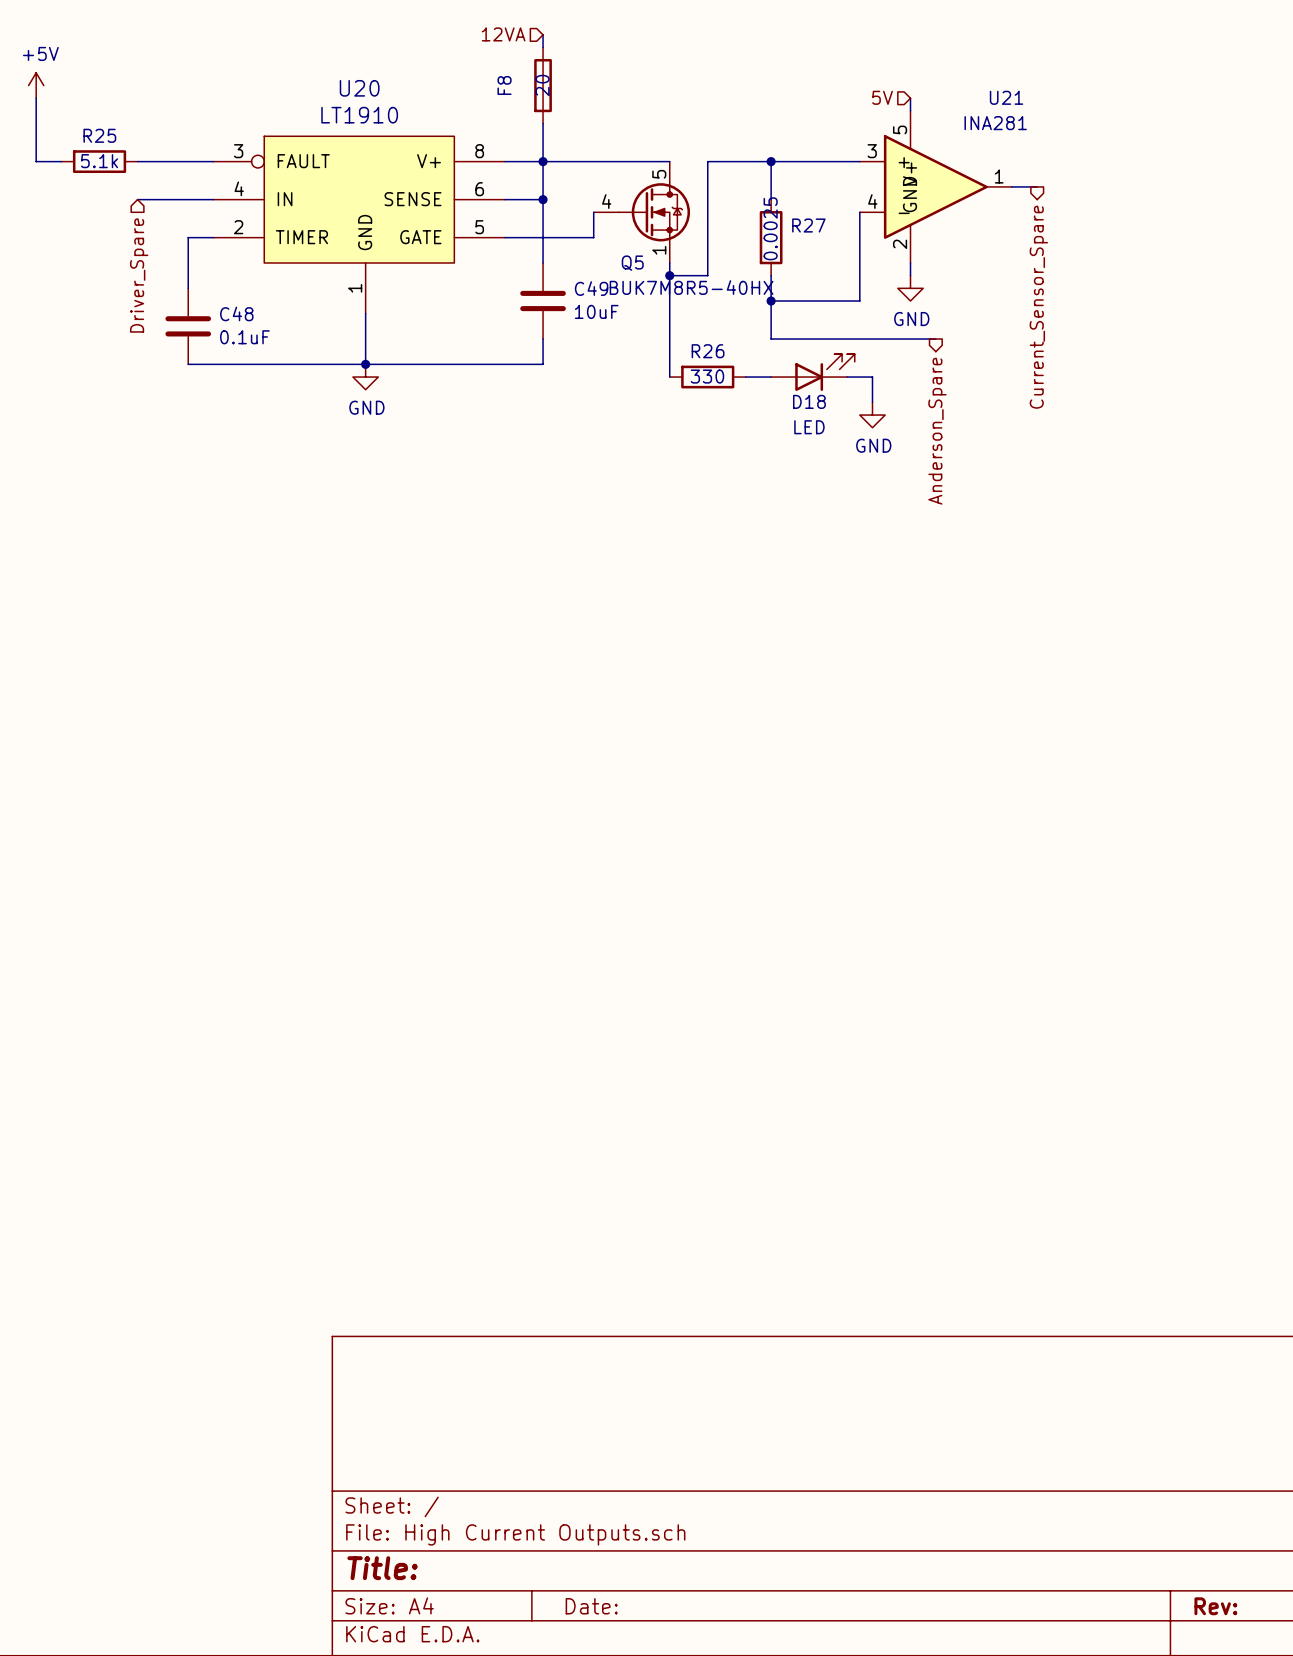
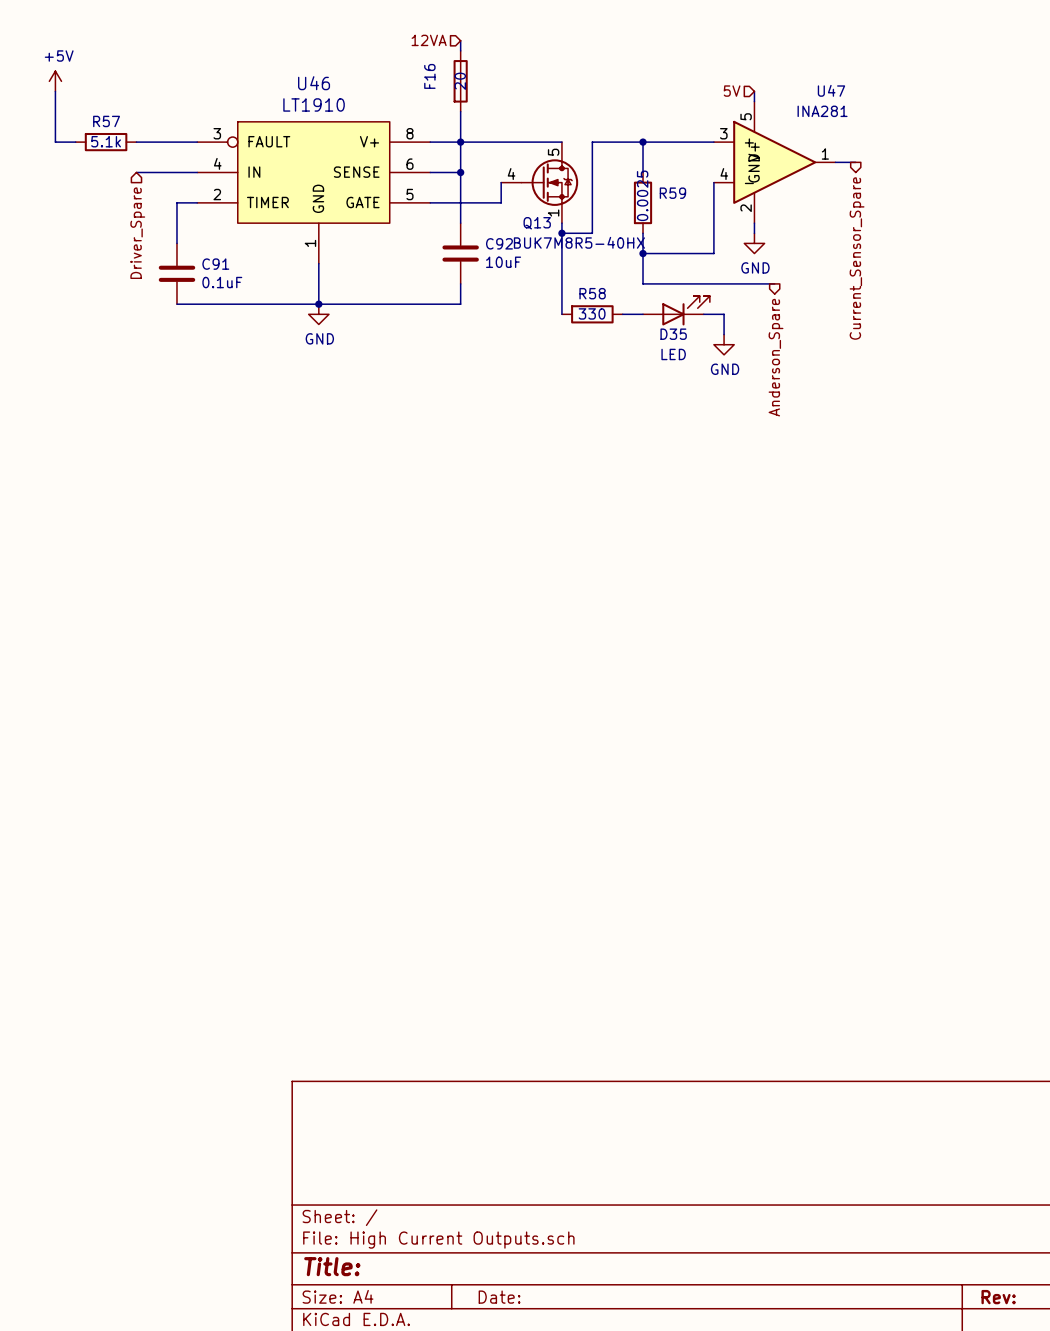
F8 name: F8 (504, 85) -> F16 (429, 76)
U20 name: U20 (359, 88) -> U46 (314, 83)
U21 name: U21 (1006, 97) -> U47 (831, 90)
R25 name: R25 (99, 135) -> R57 (106, 121)
R27 name: R27 (808, 225) -> R59 (672, 193)
Q5 name: Q5 (632, 263) -> Q13 (537, 223)
C49 name: C49 (591, 288) -> C92 (499, 243)
C48 name: C48 (236, 313) -> C91 (215, 264)
R26 name: R26 (708, 351) -> R58 (592, 293)
D18 name: D18 (809, 401) -> D35 (673, 334)

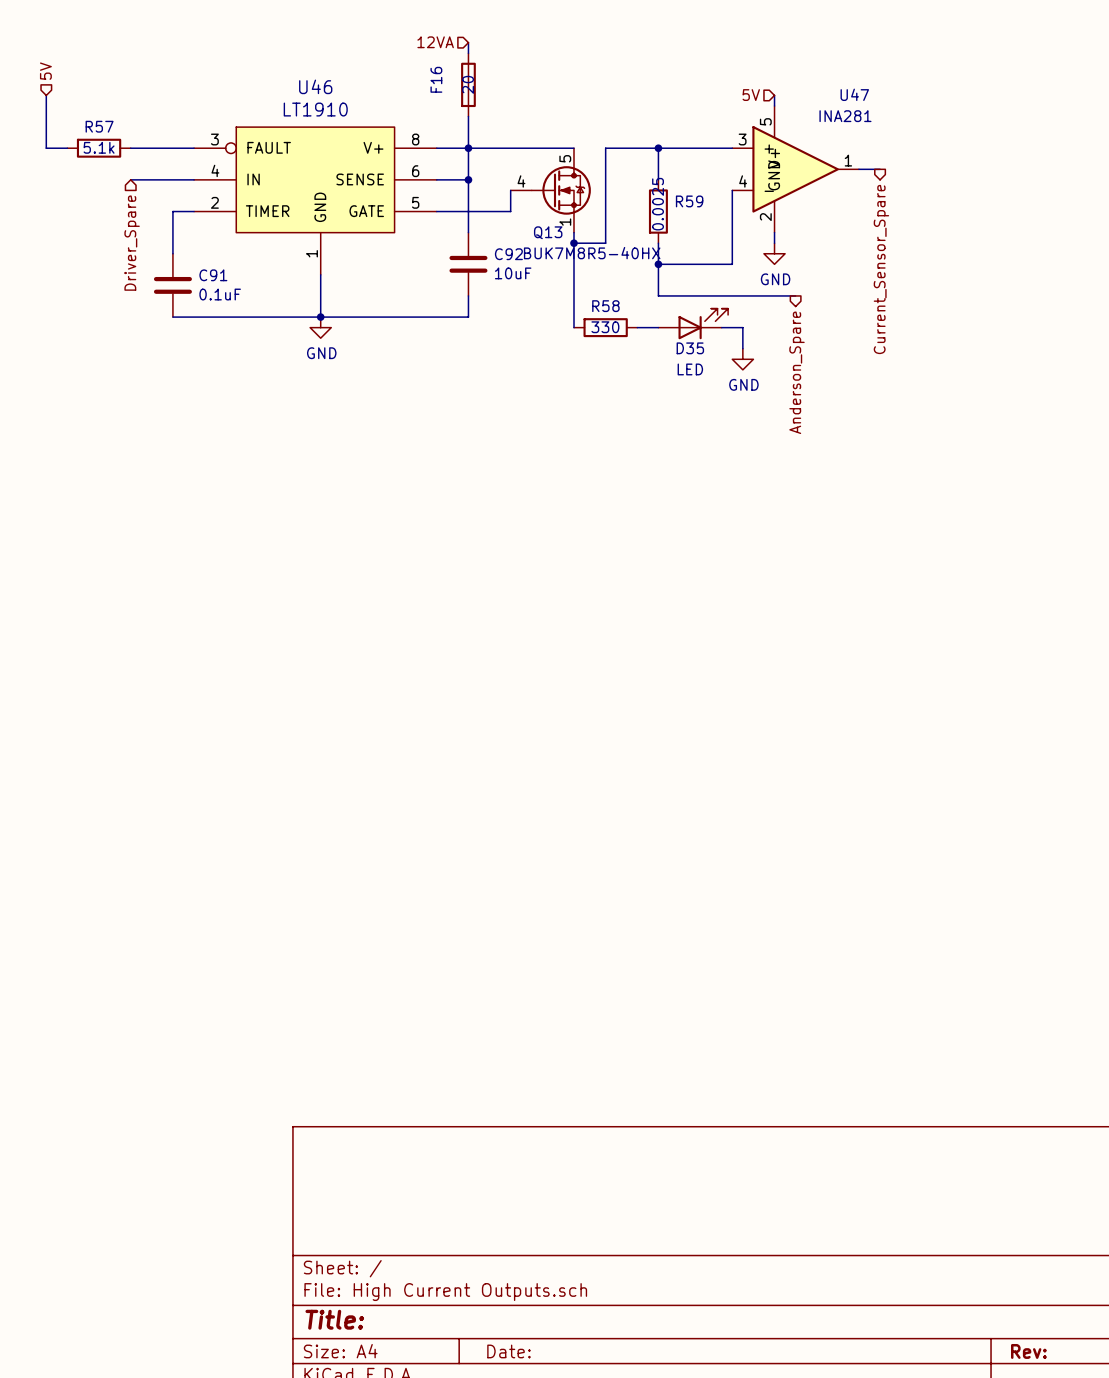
hierarchical label: none -> 5V (45, 71)
power symbol: +5V (55, 81) -> none

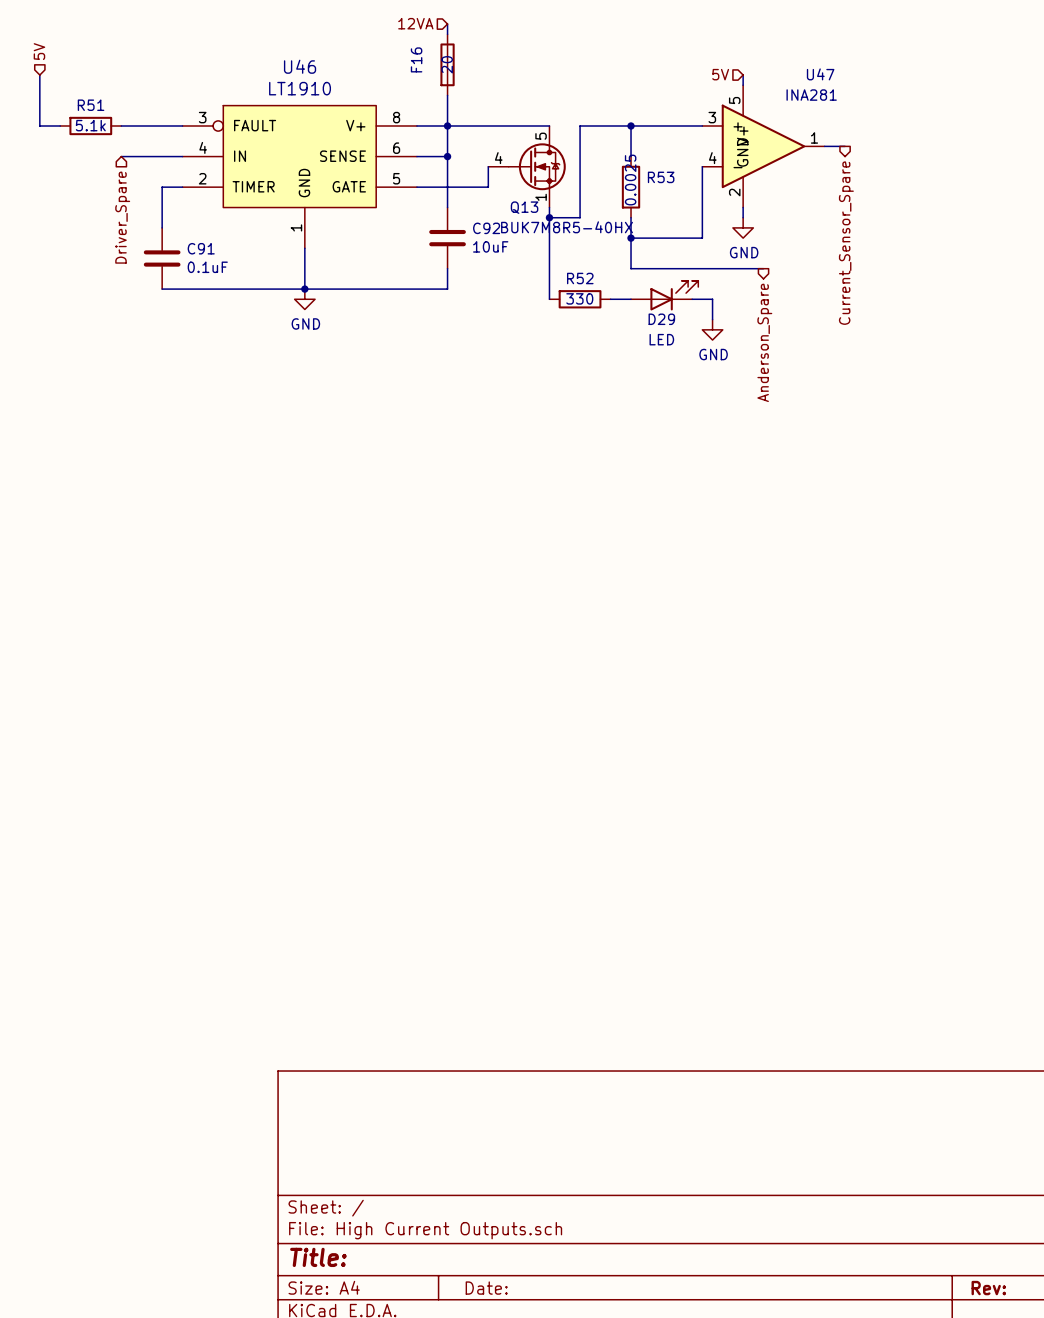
R57 name: R57 (99, 126) -> R51 (91, 105)
R59 name: R59 (689, 201) -> R53 (661, 177)
R58 name: R58 (605, 306) -> R52 (580, 278)
D35 name: D35 (690, 348) -> D29 (661, 319)

